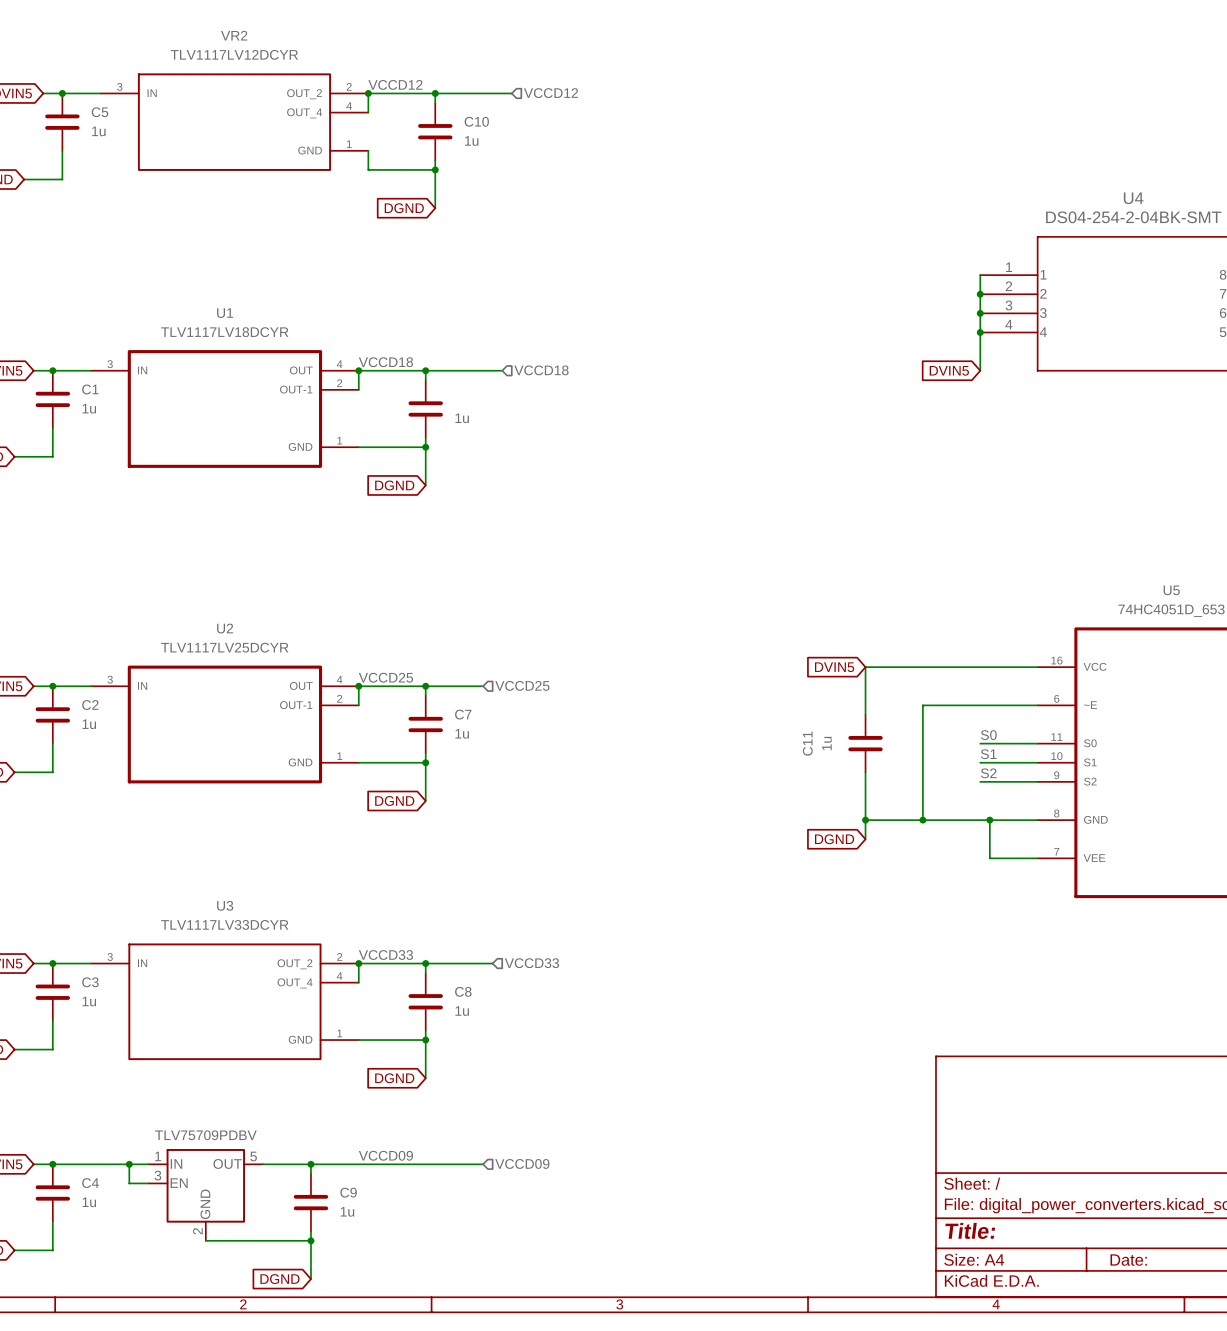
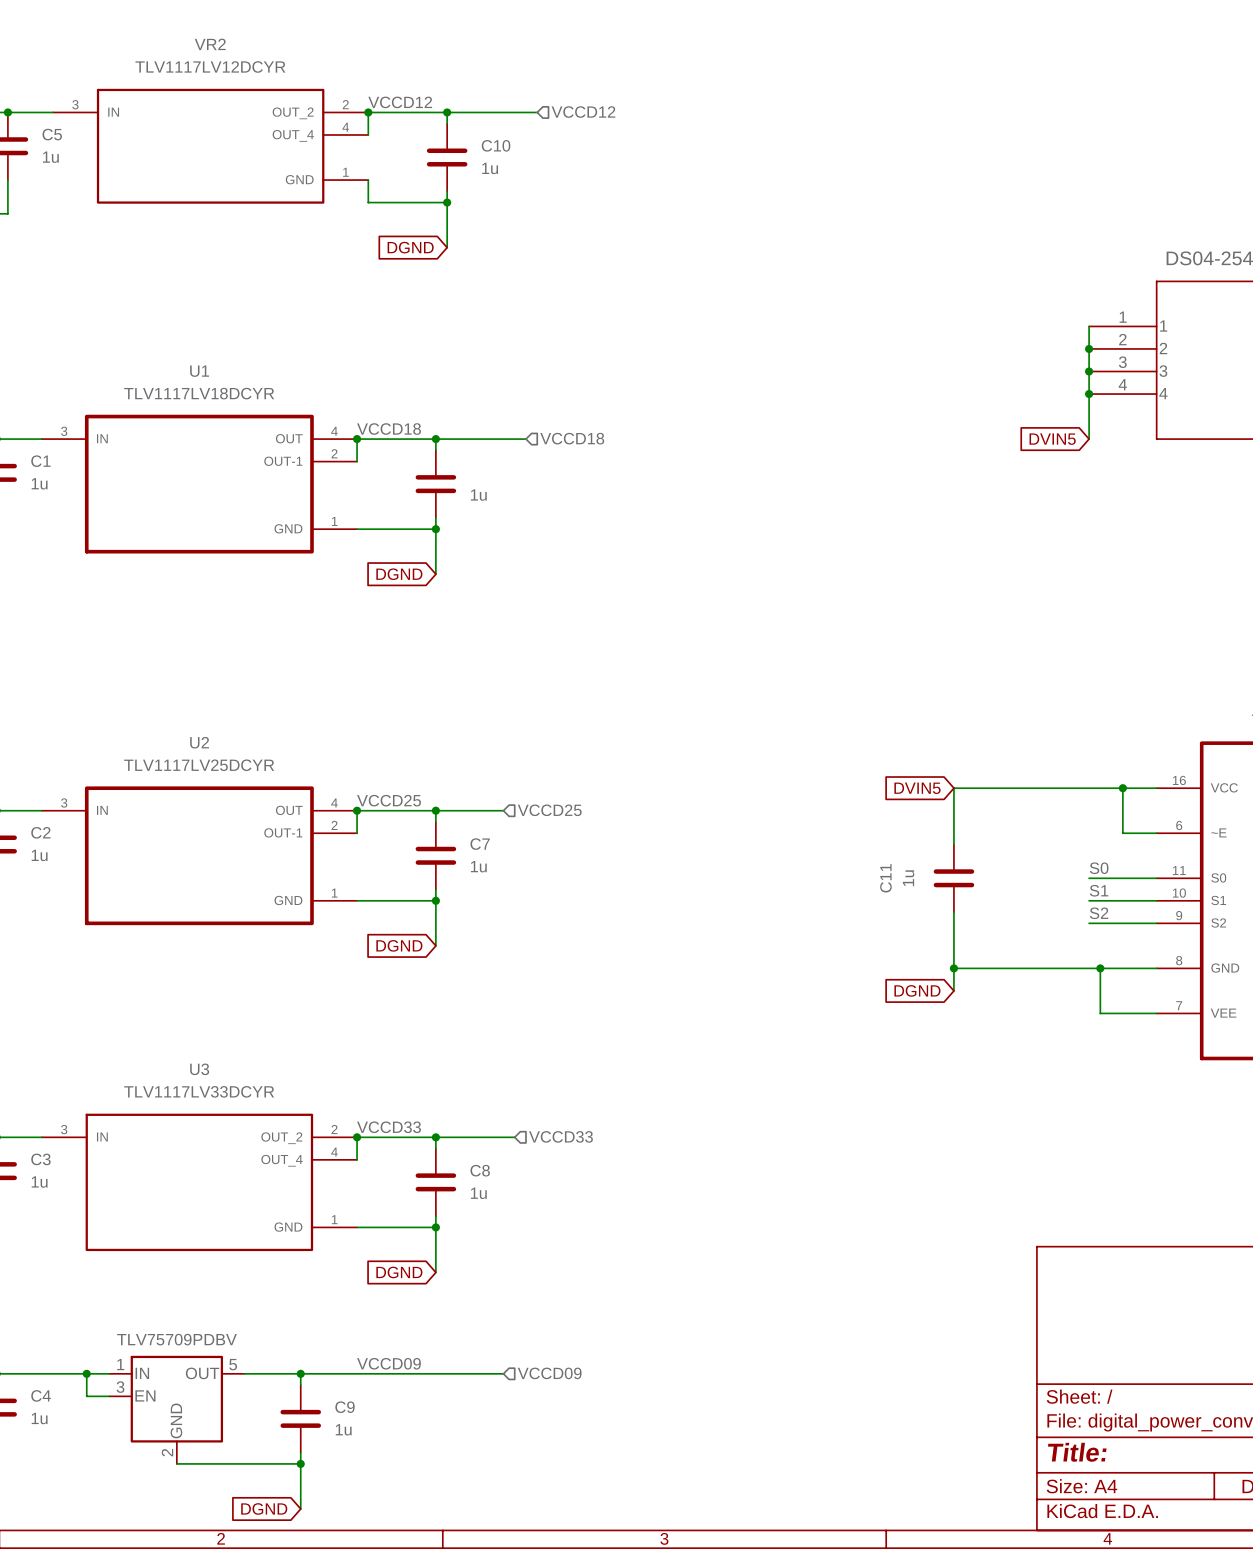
junction: none -> (1122, 788)
wire: (1008, 705) (922, 705) (922, 820) -> (1122, 833) (1122, 788)
junction: (922, 820) -> none

